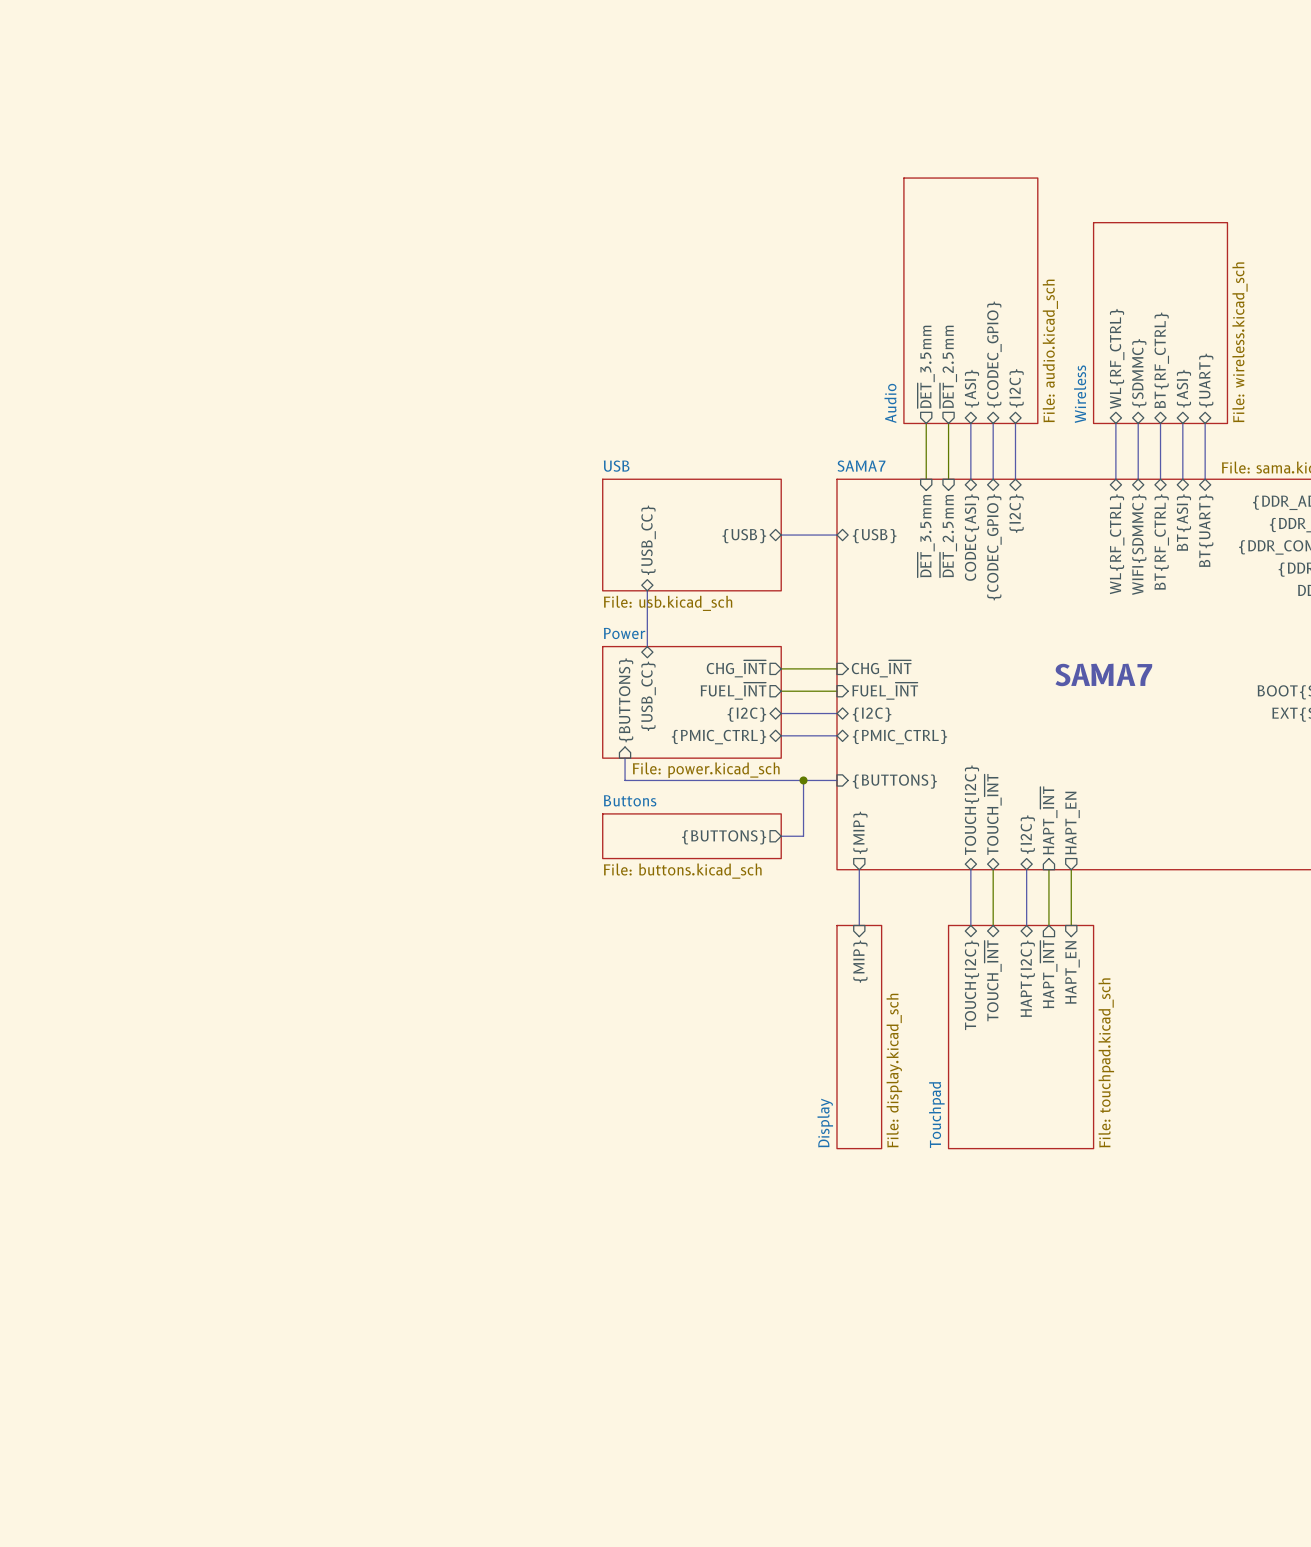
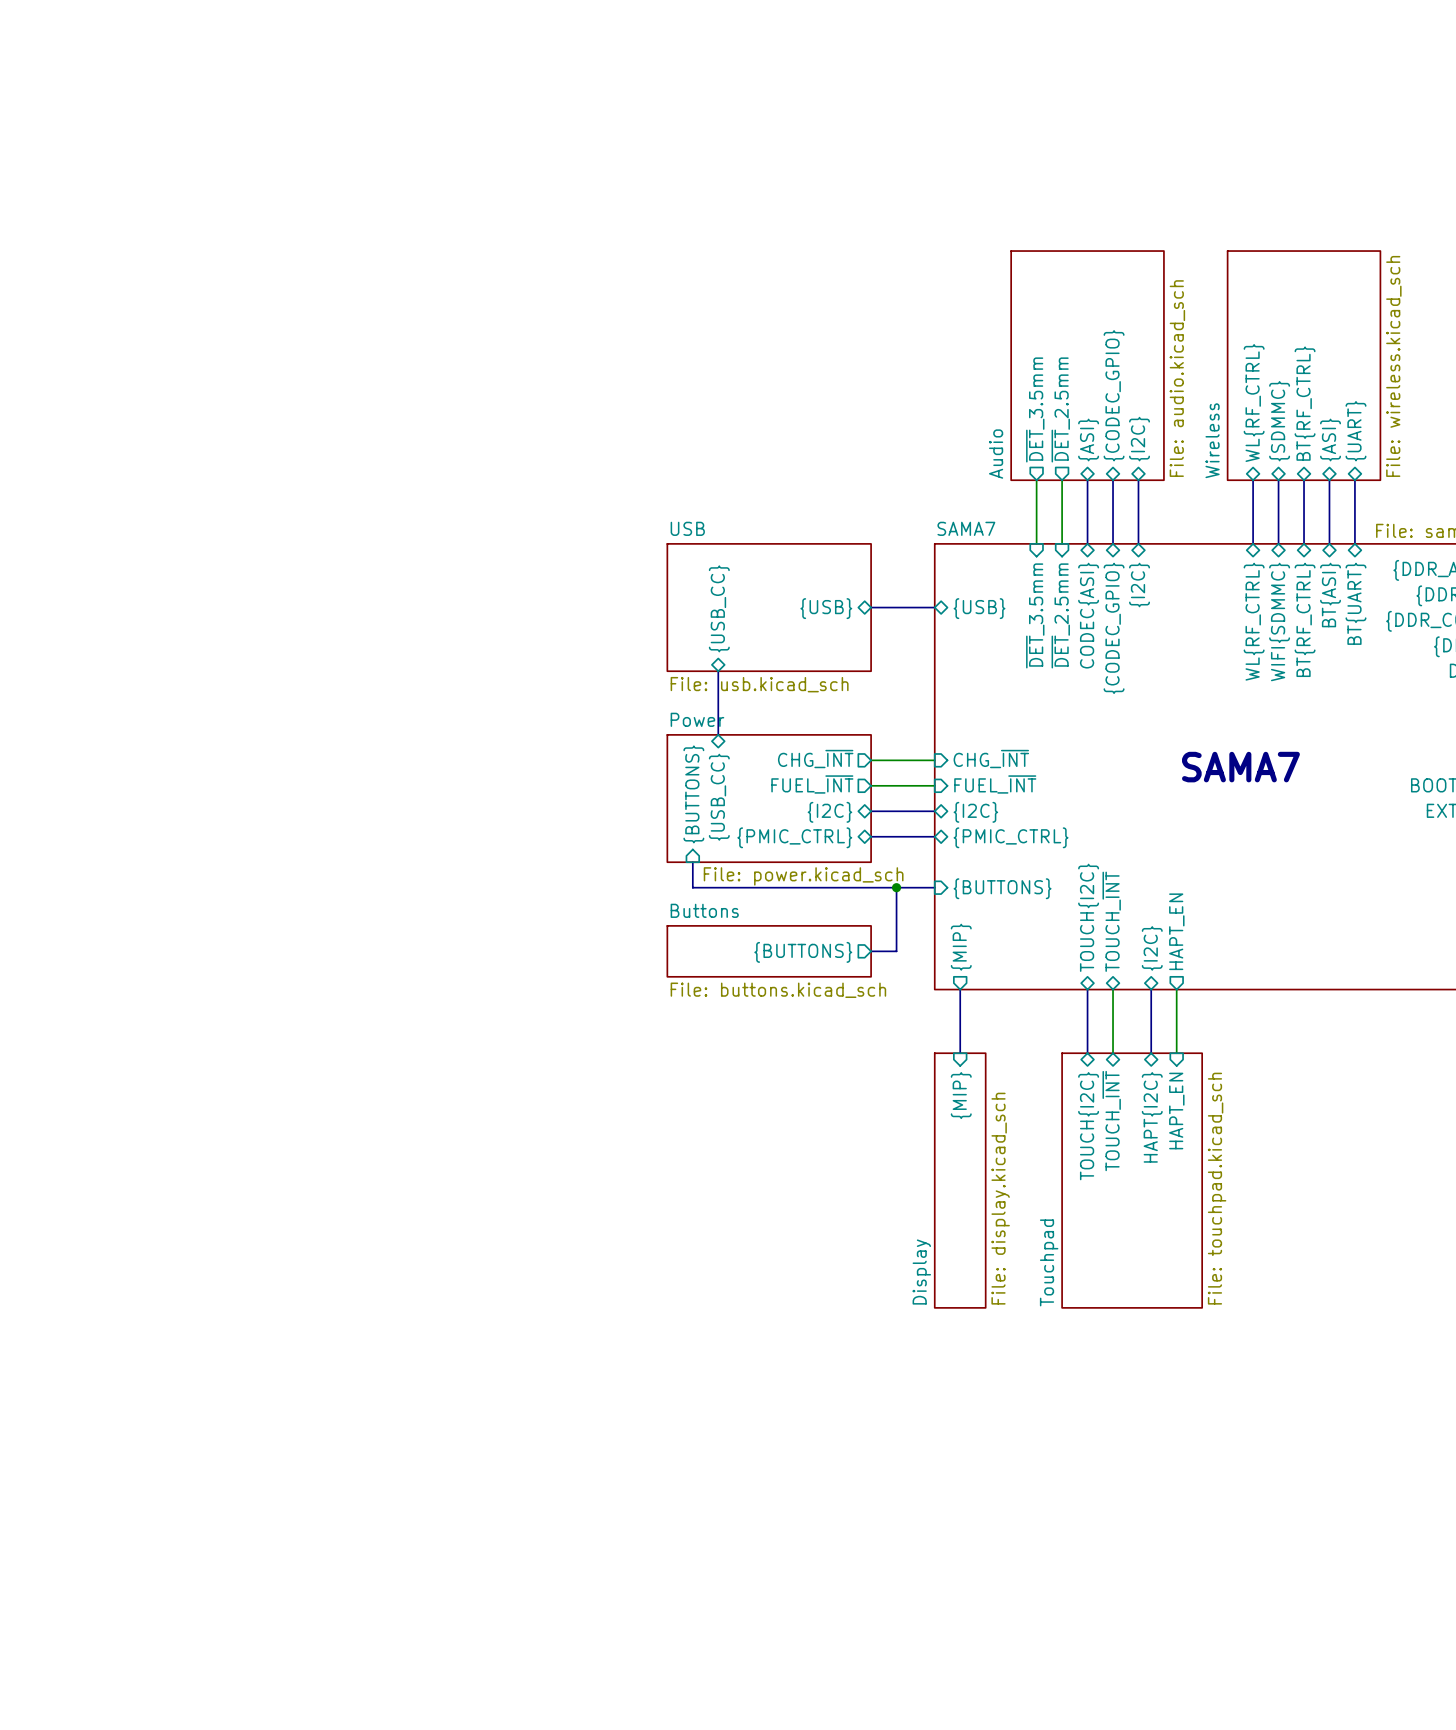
sheet Audio: File: audio.kicad_sch (970, 300) -> none
sheet Audio: none -> File: audio.kicad_sch (1087, 365)
sheet pin shape: input (1048, 820) -> output (1176, 931)
sheet pin: HAPT_~{INT} (1048, 820) -> HAPT_EN (1176, 931)
sheet pin: HAPT_EN (1072, 823) -> none
wire: (1071, 869) (1071, 925) -> none
sheet pin: HAPT_EN (1072, 972) -> none
sheet pin shape: output (1048, 974) -> input (1176, 1111)
sheet pin: HAPT_~{INT} (1048, 974) -> HAPT_EN (1176, 1111)
sheet Touchpad: none -> File: touchpad.kicad_sch (1132, 1180)
sheet Touchpad: File: touchpad.kicad_sch (1021, 1037) -> none

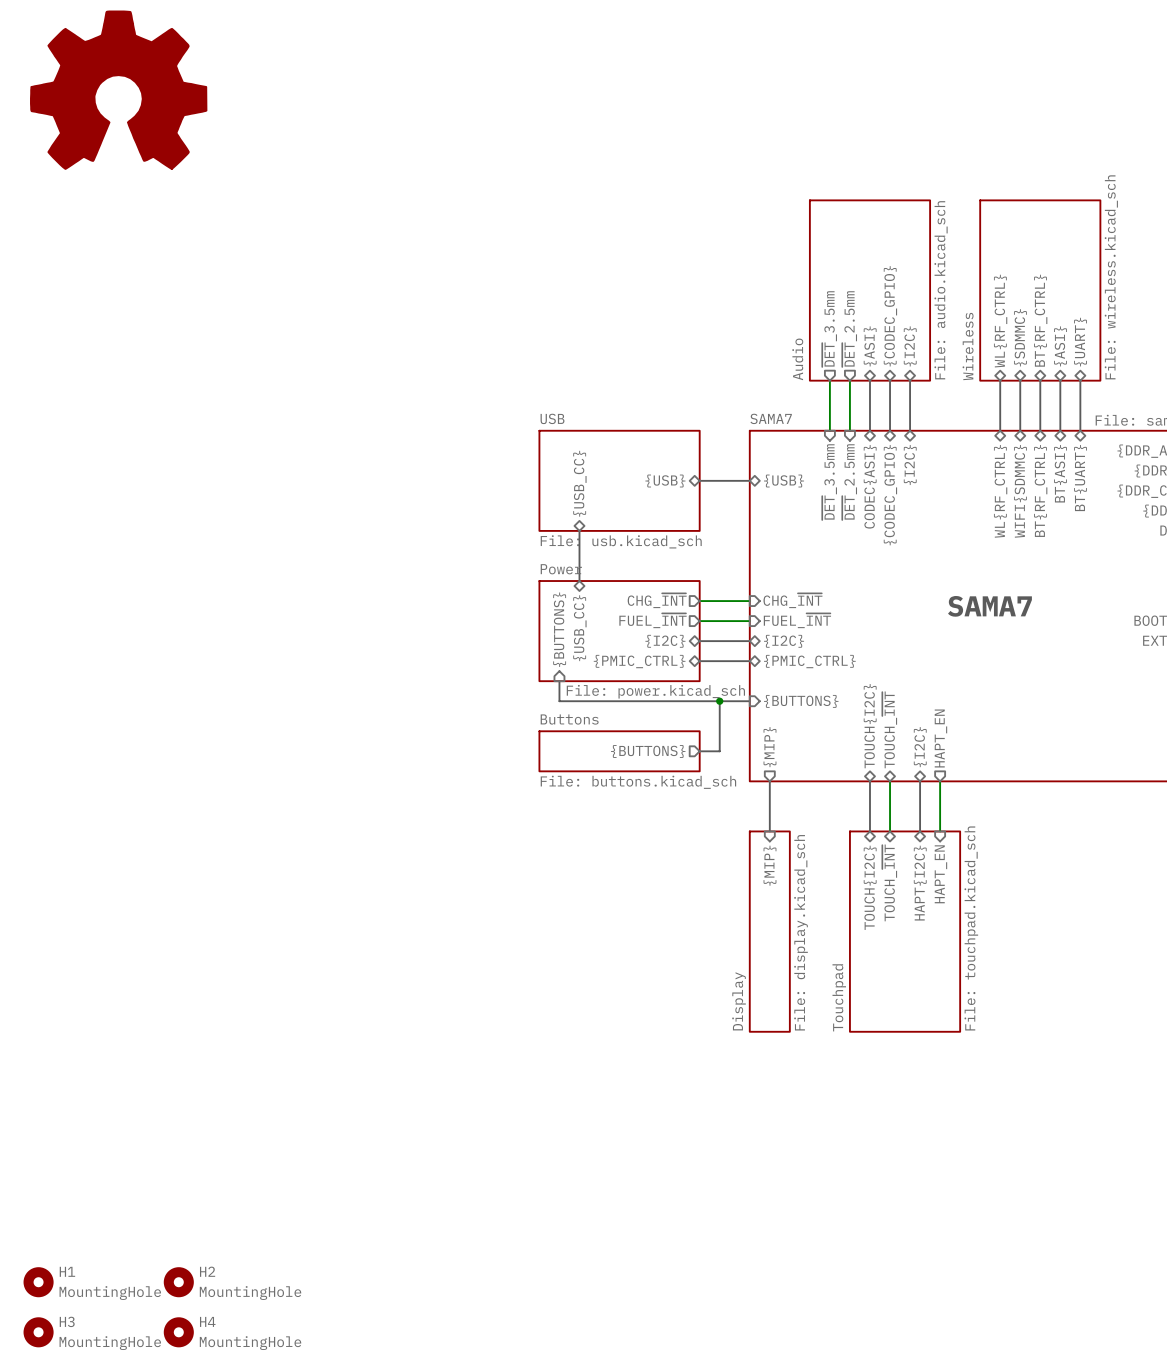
part: none -> (118, 90)
H1: none -> MountingHole (38, 1282)
H2: none -> MountingHole (178, 1282)
H3: none -> MountingHole (38, 1332)
H4: none -> MountingHole (178, 1332)

